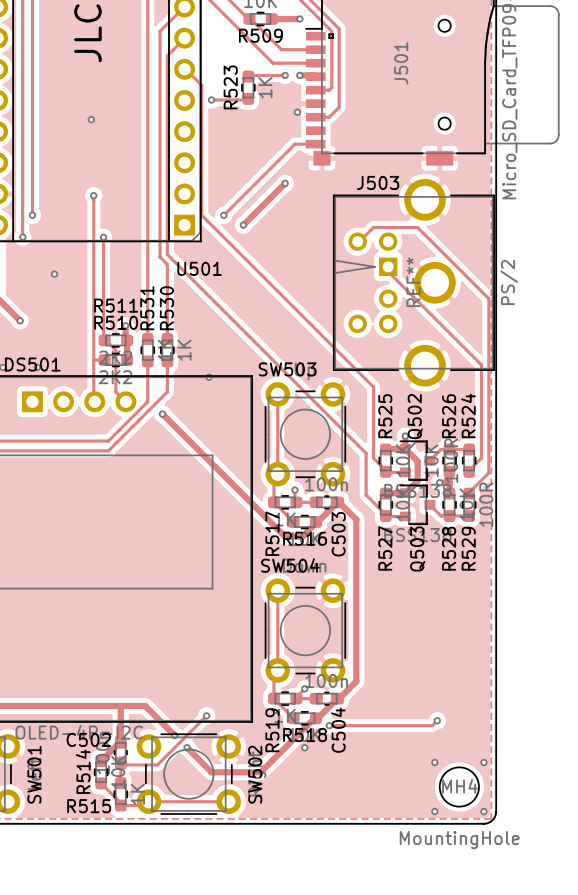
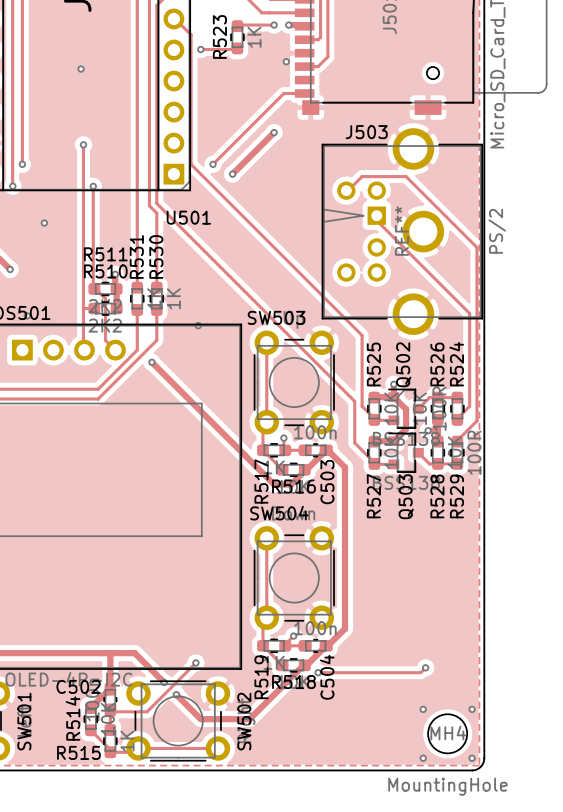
via: (304, 747) -> none

